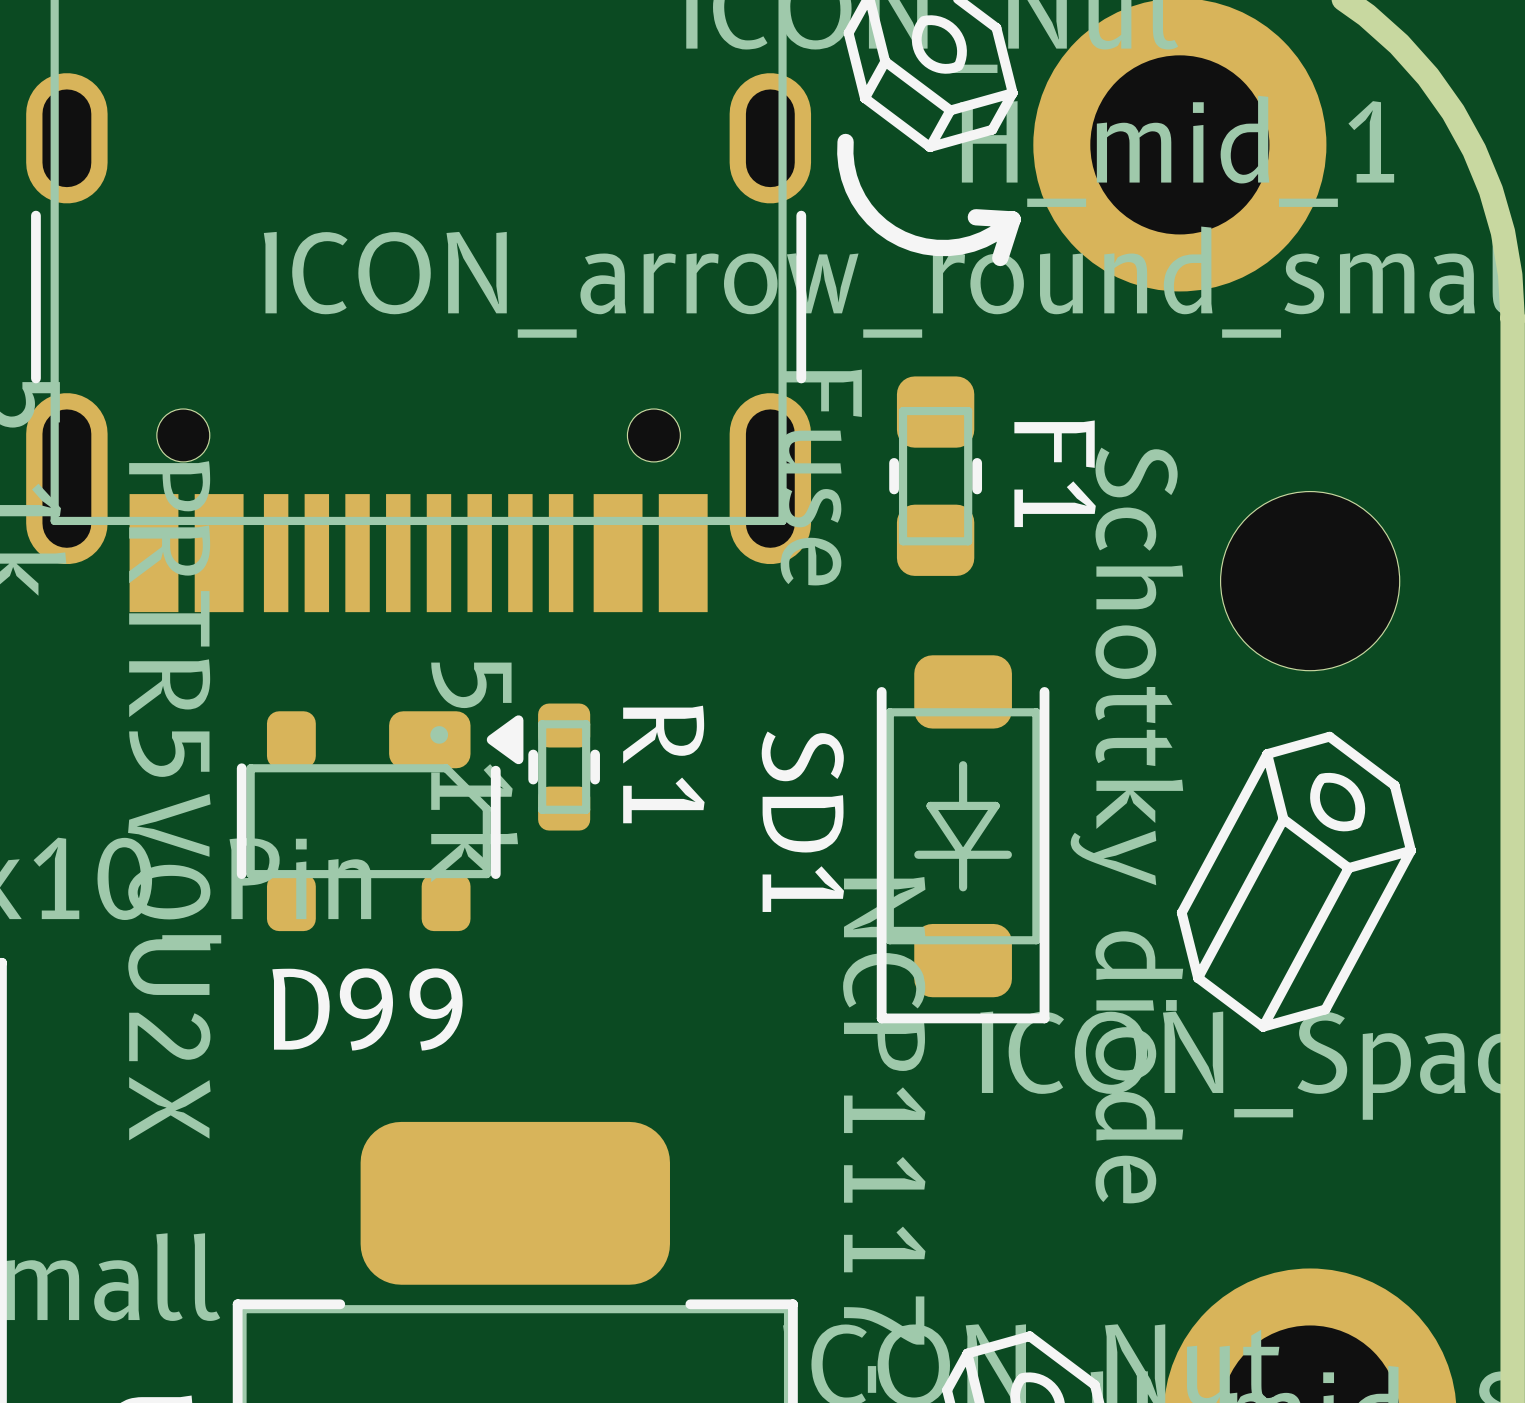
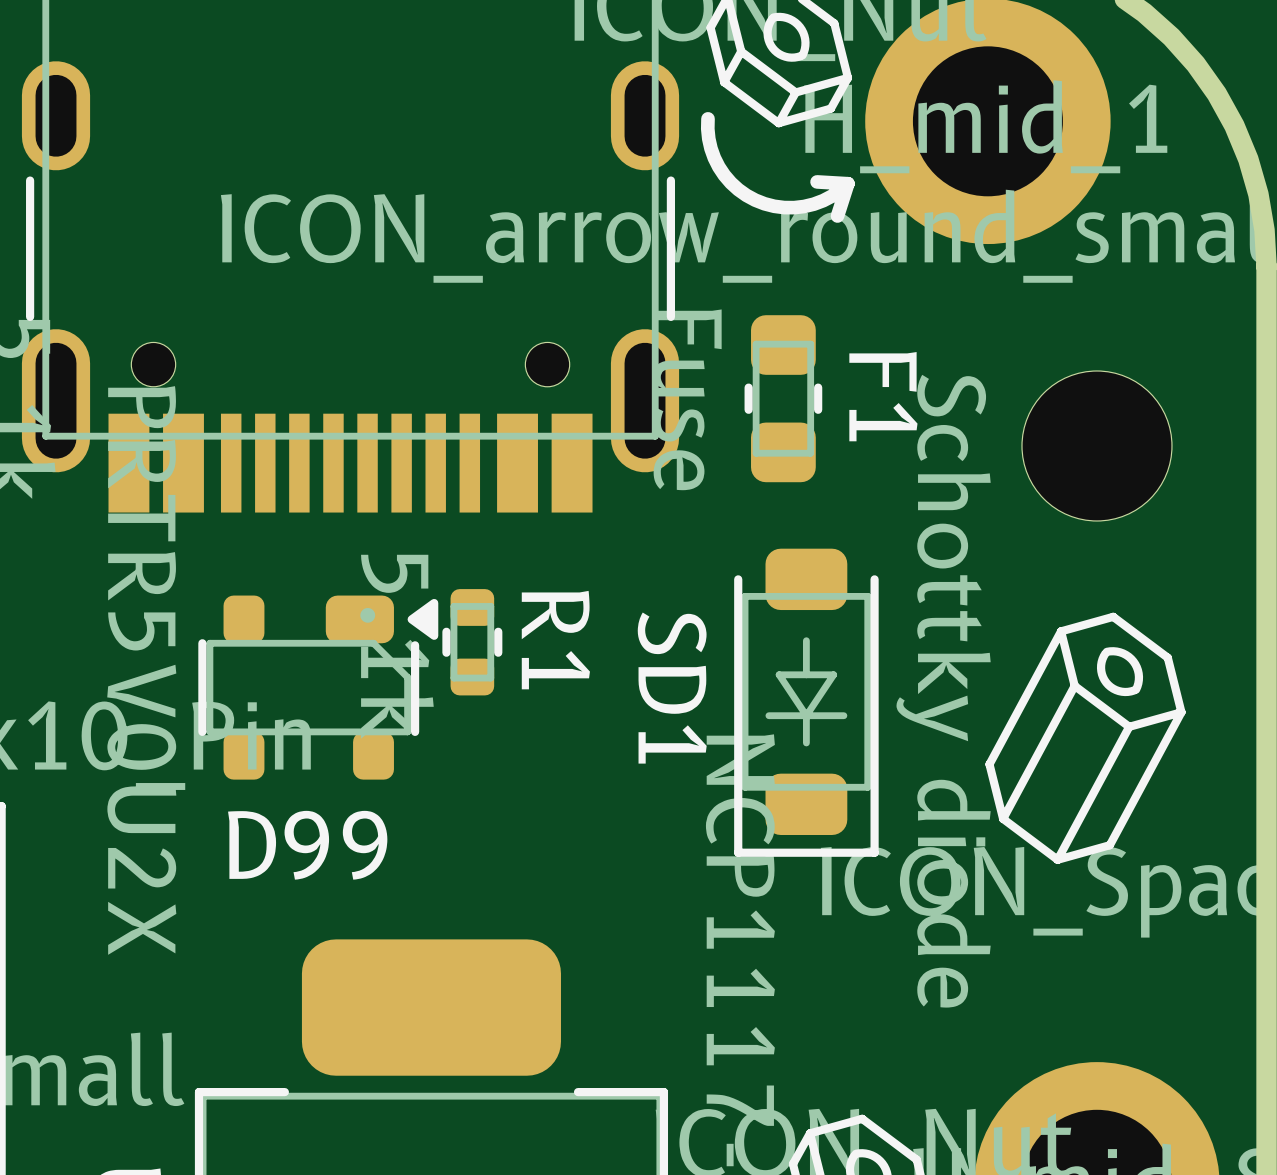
part position: (1310, 581) -> (1096, 445)

